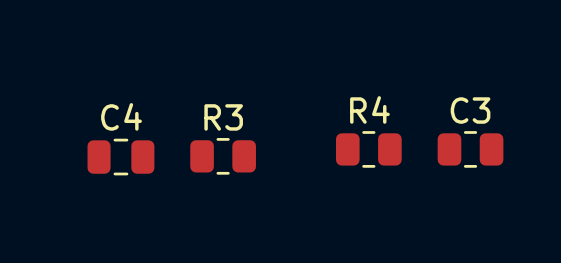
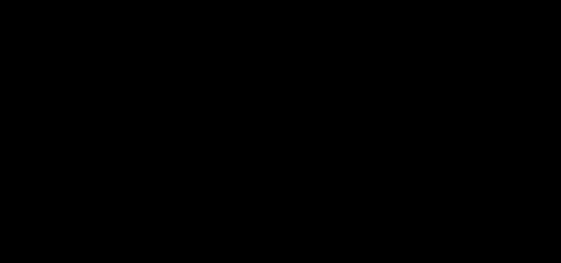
R4: (368, 149) -> none
C3: (470, 149) -> none
R3: (223, 156) -> none
C4: (120, 157) -> none

